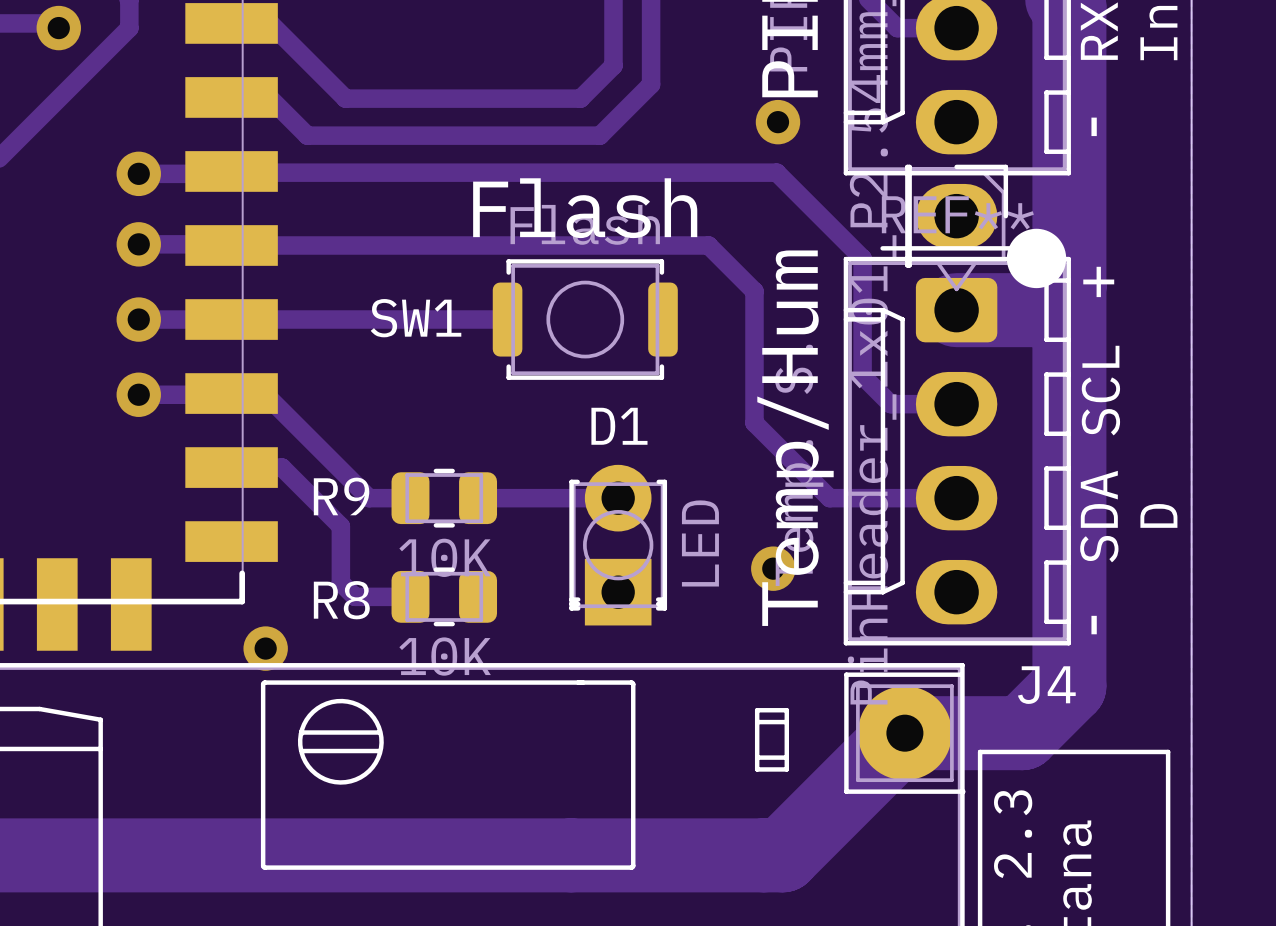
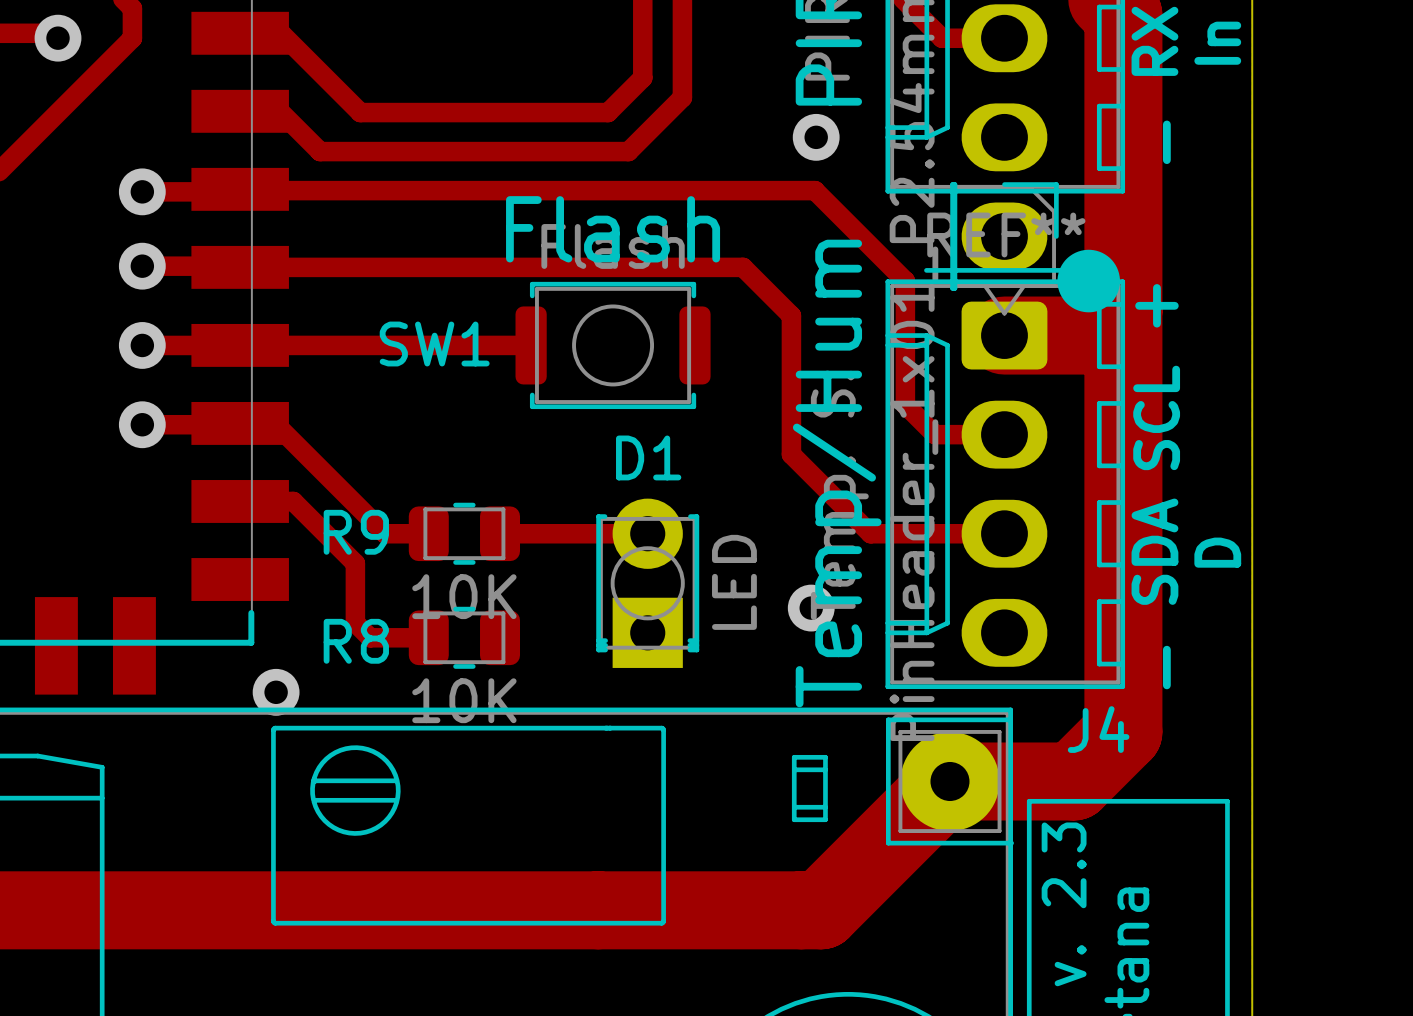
text position: - (1094, 126) -> - (1166, 142)
text position: - (1094, 625) -> - (1166, 667)

